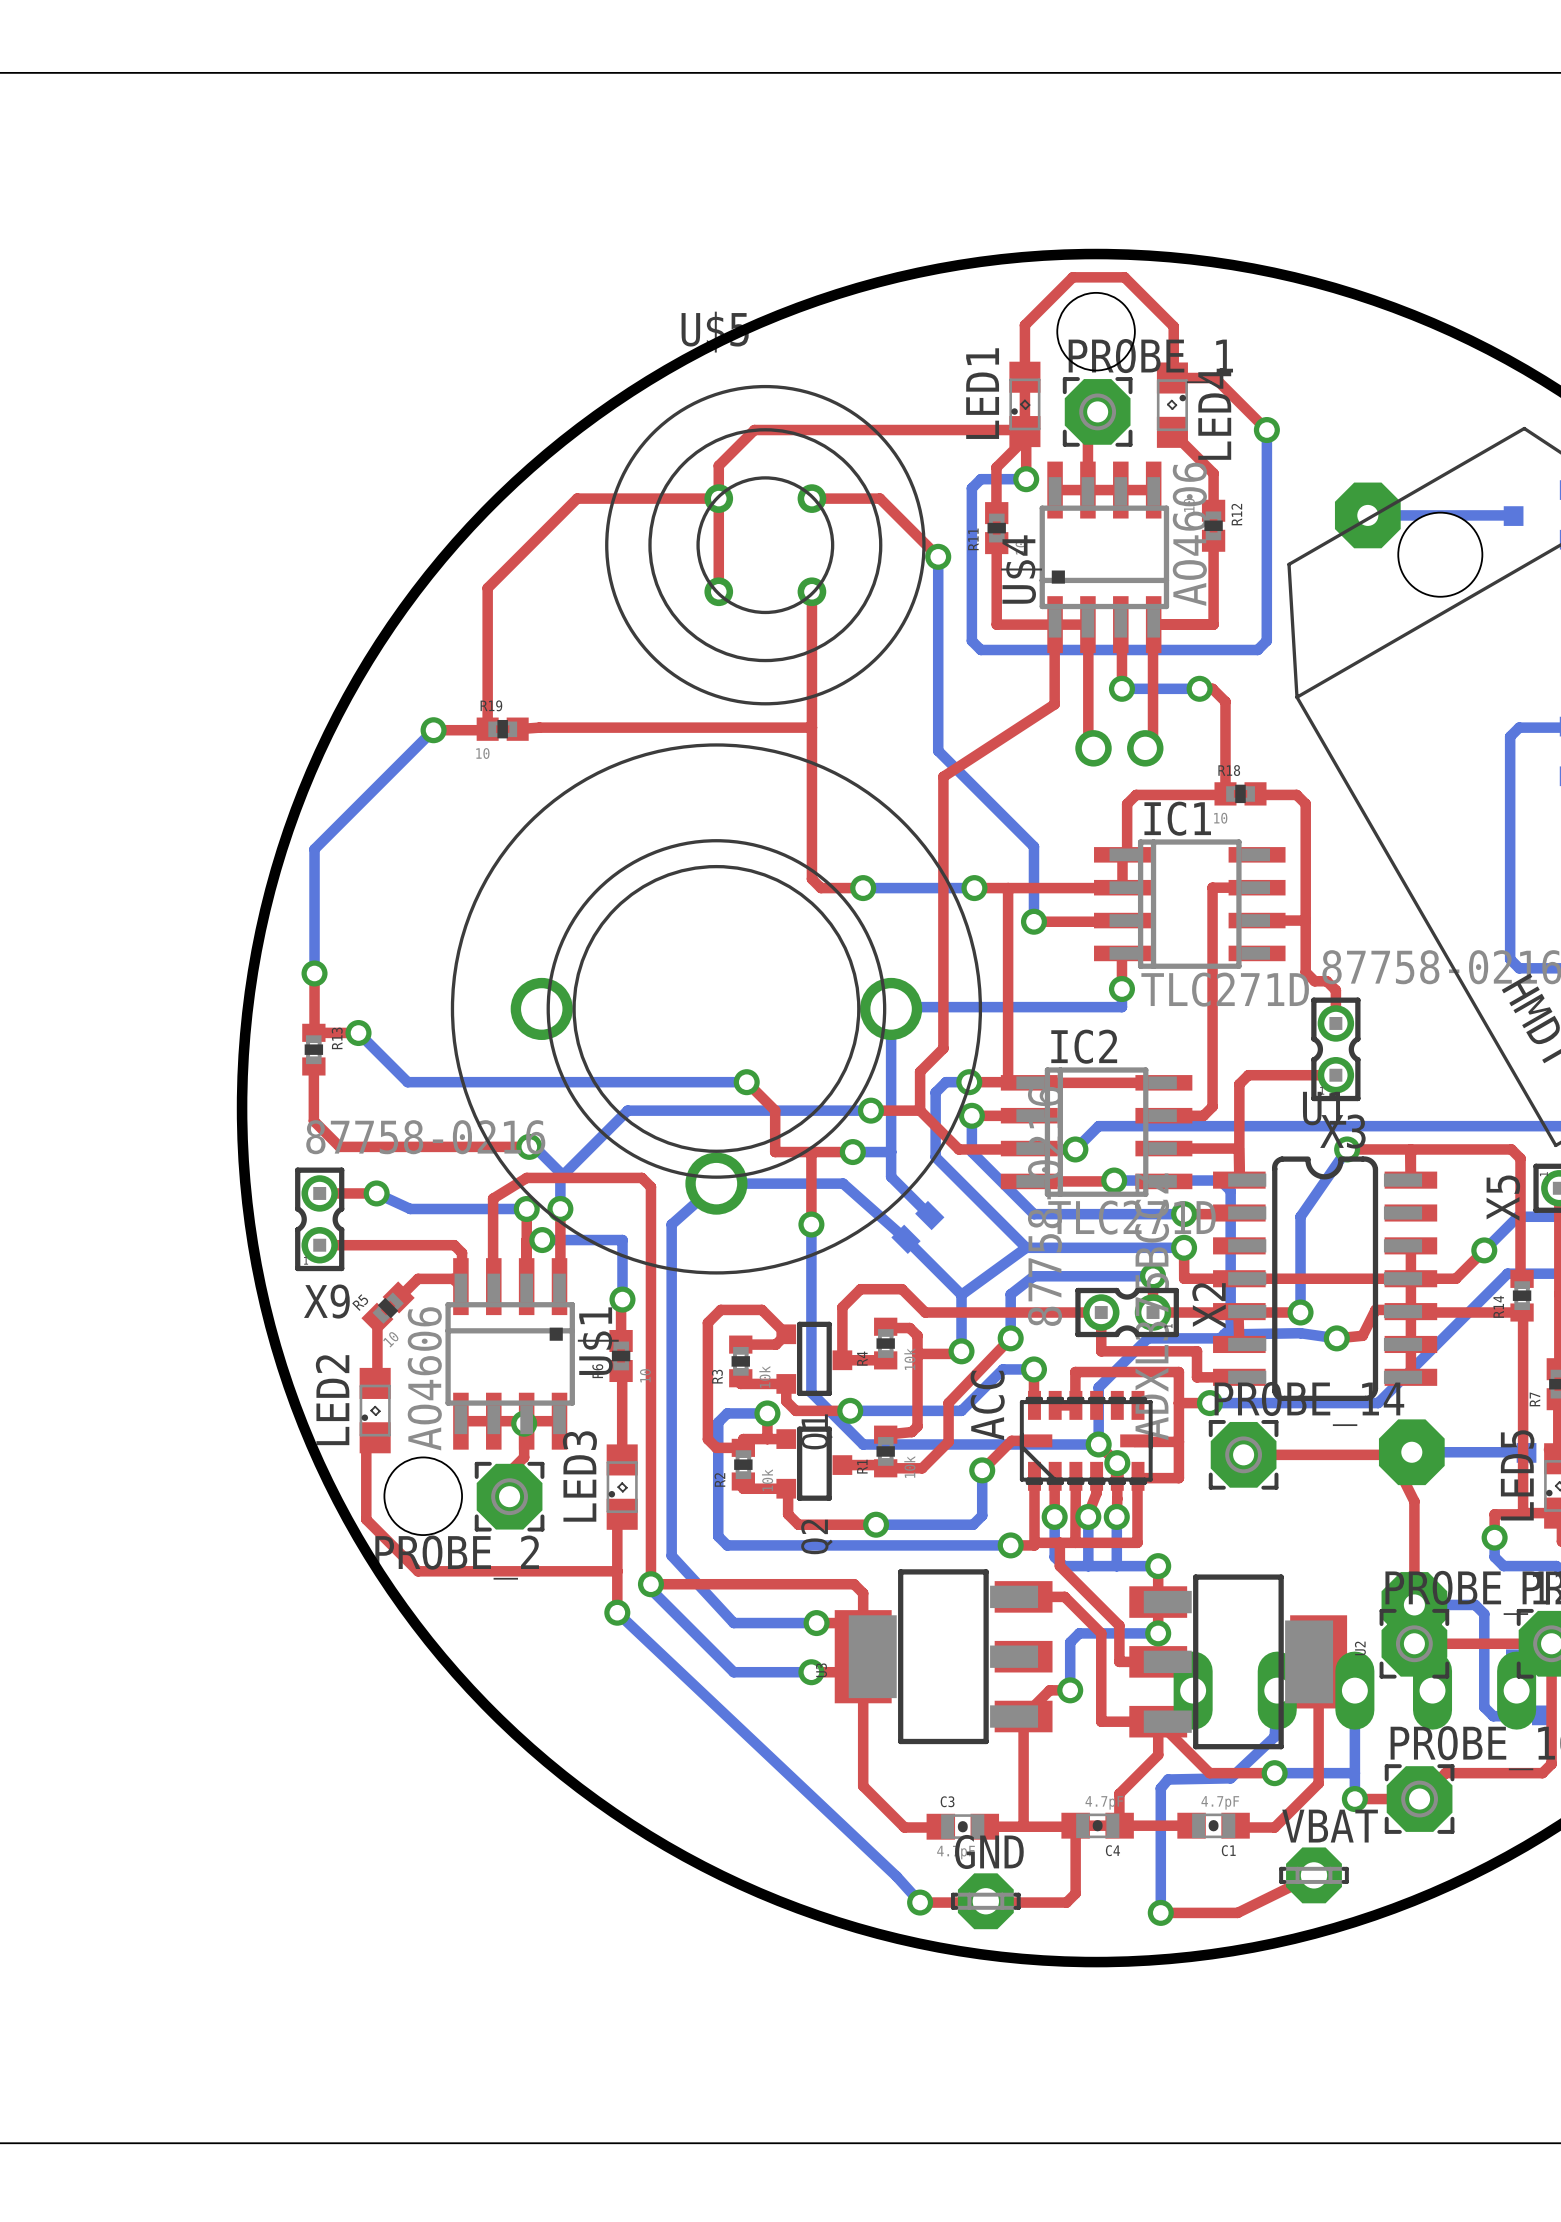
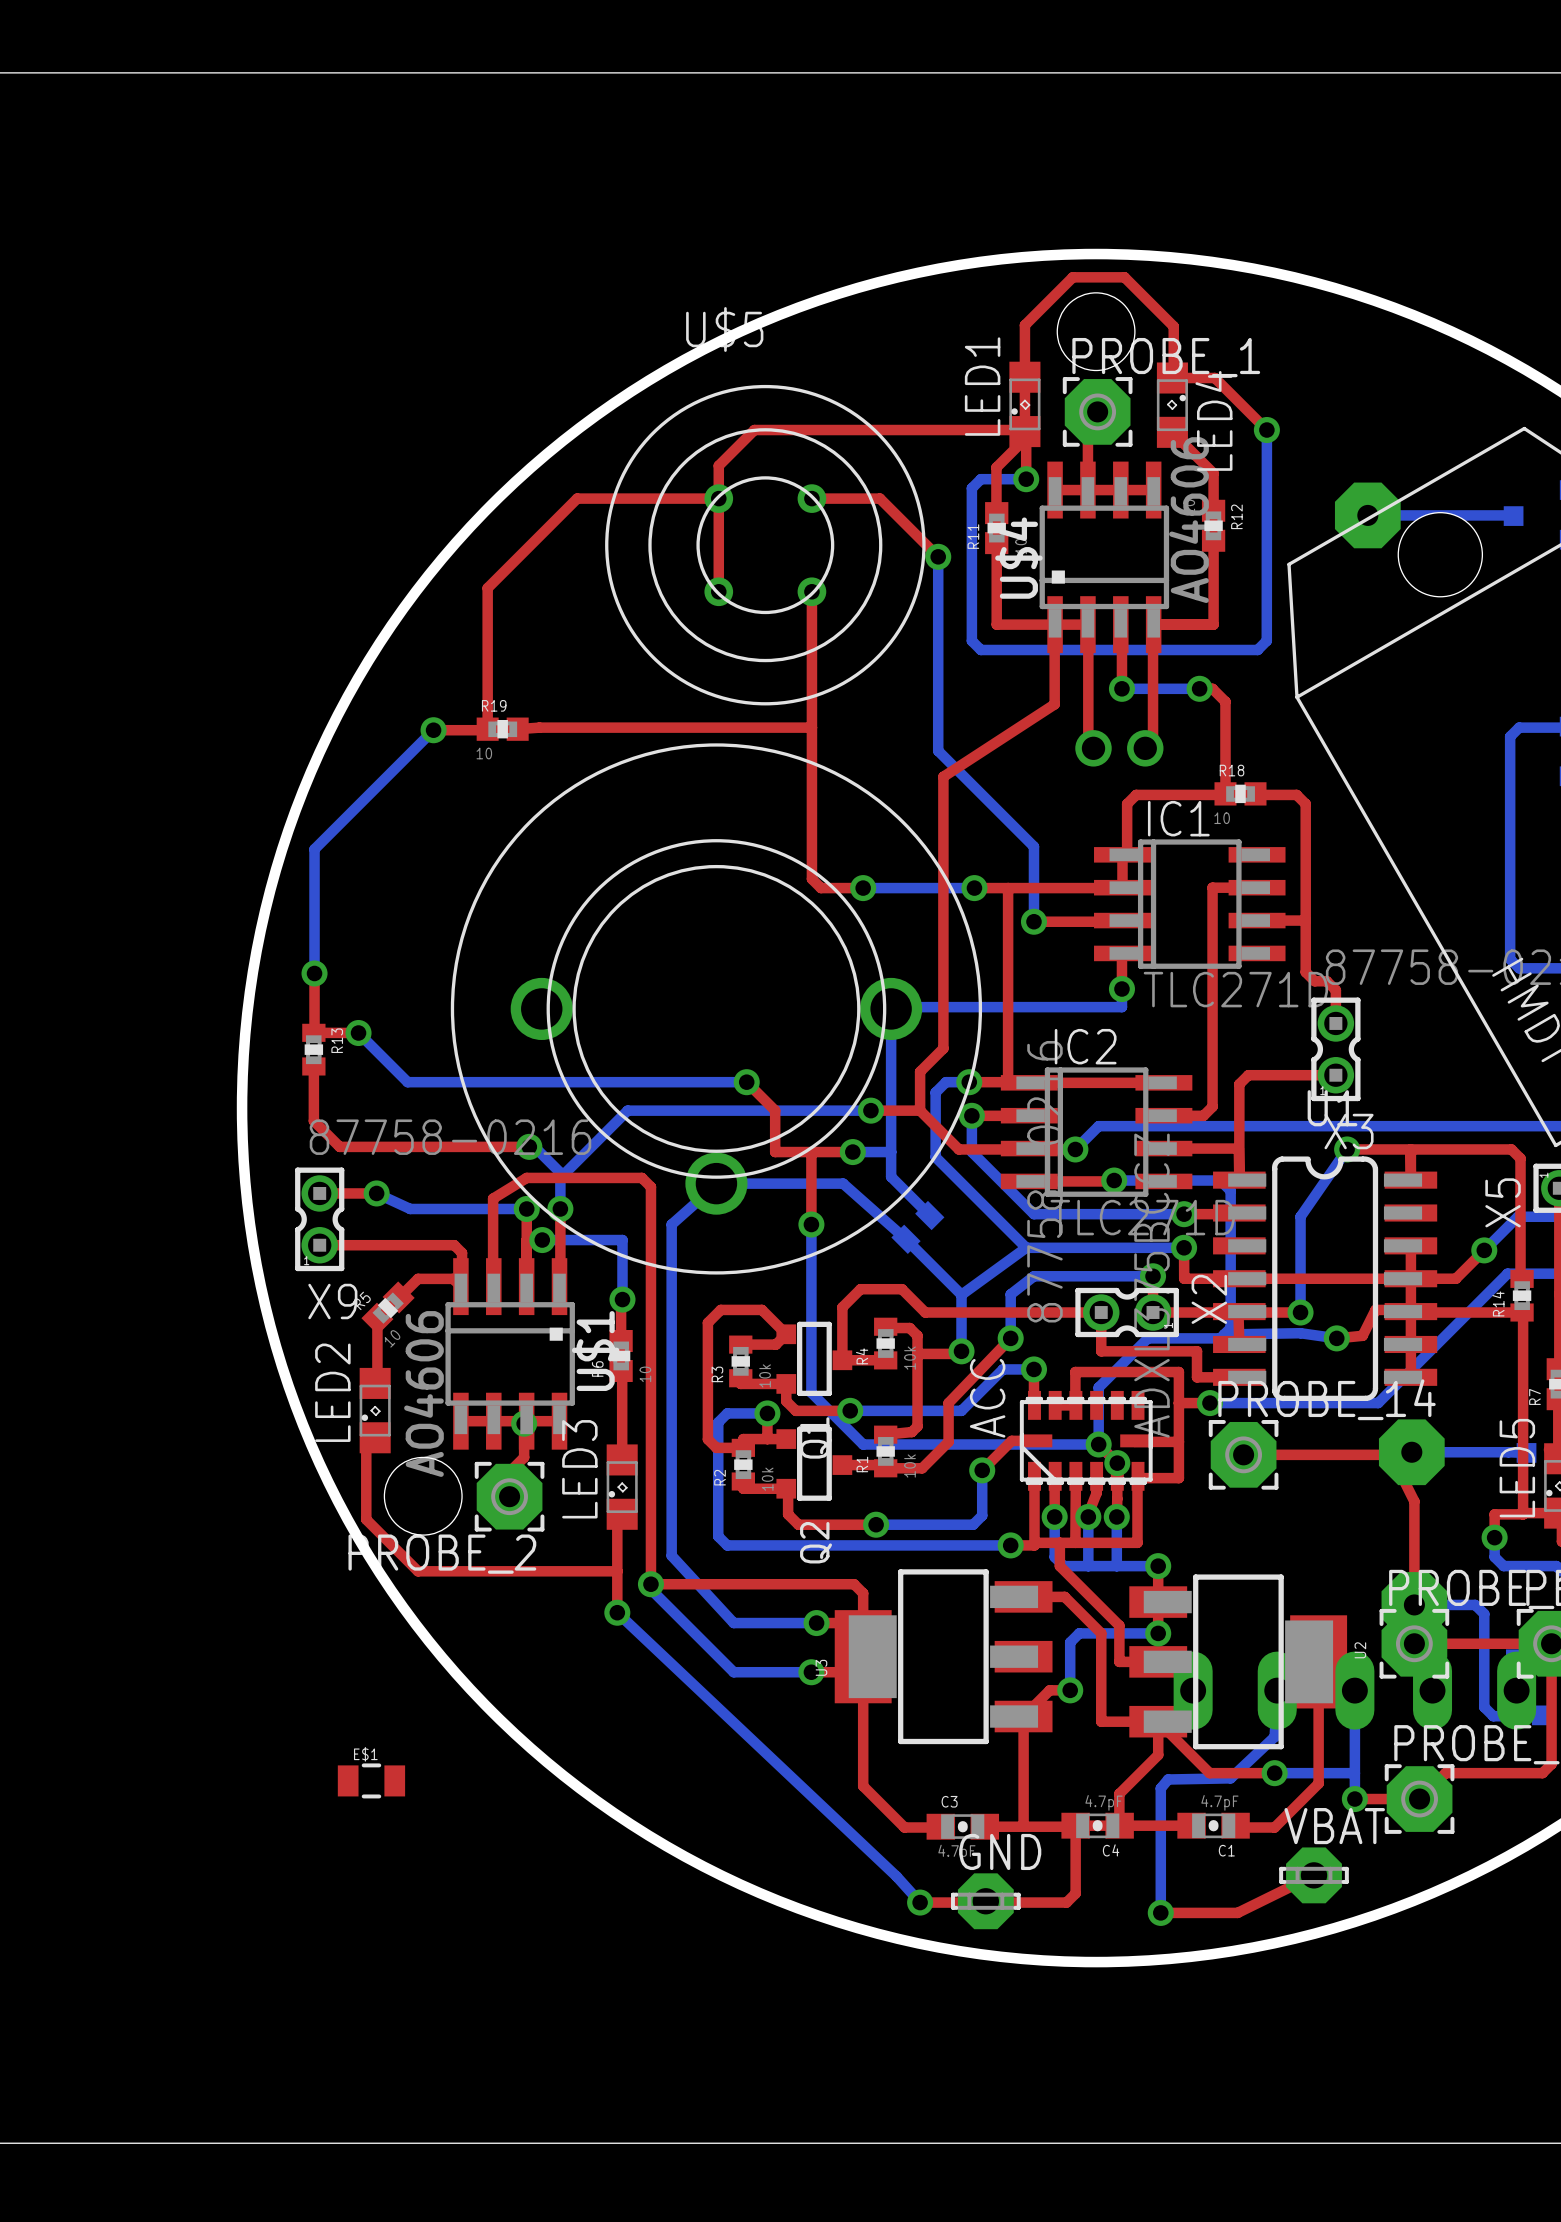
E$1: none -> (371, 1780)

